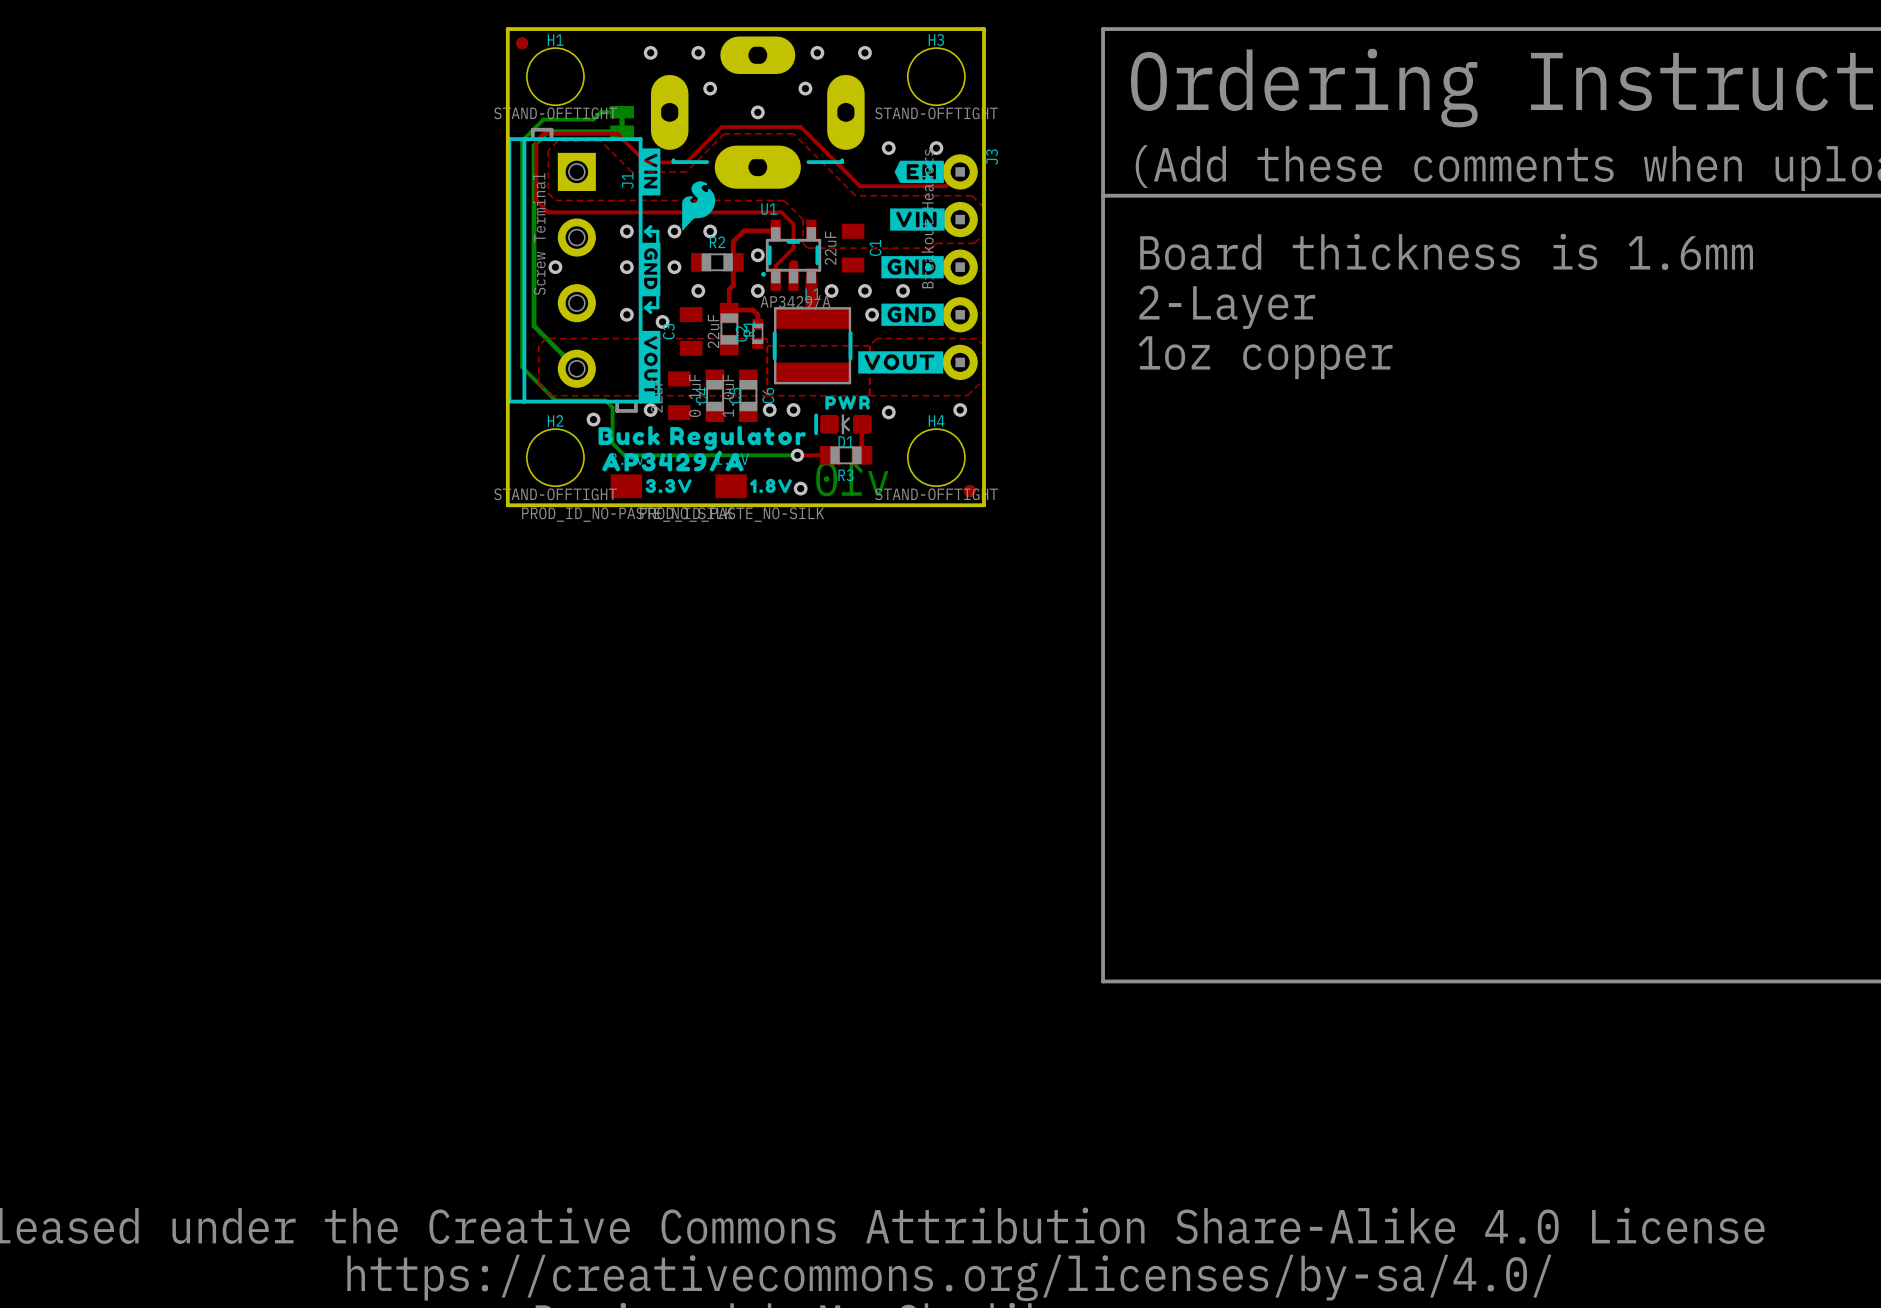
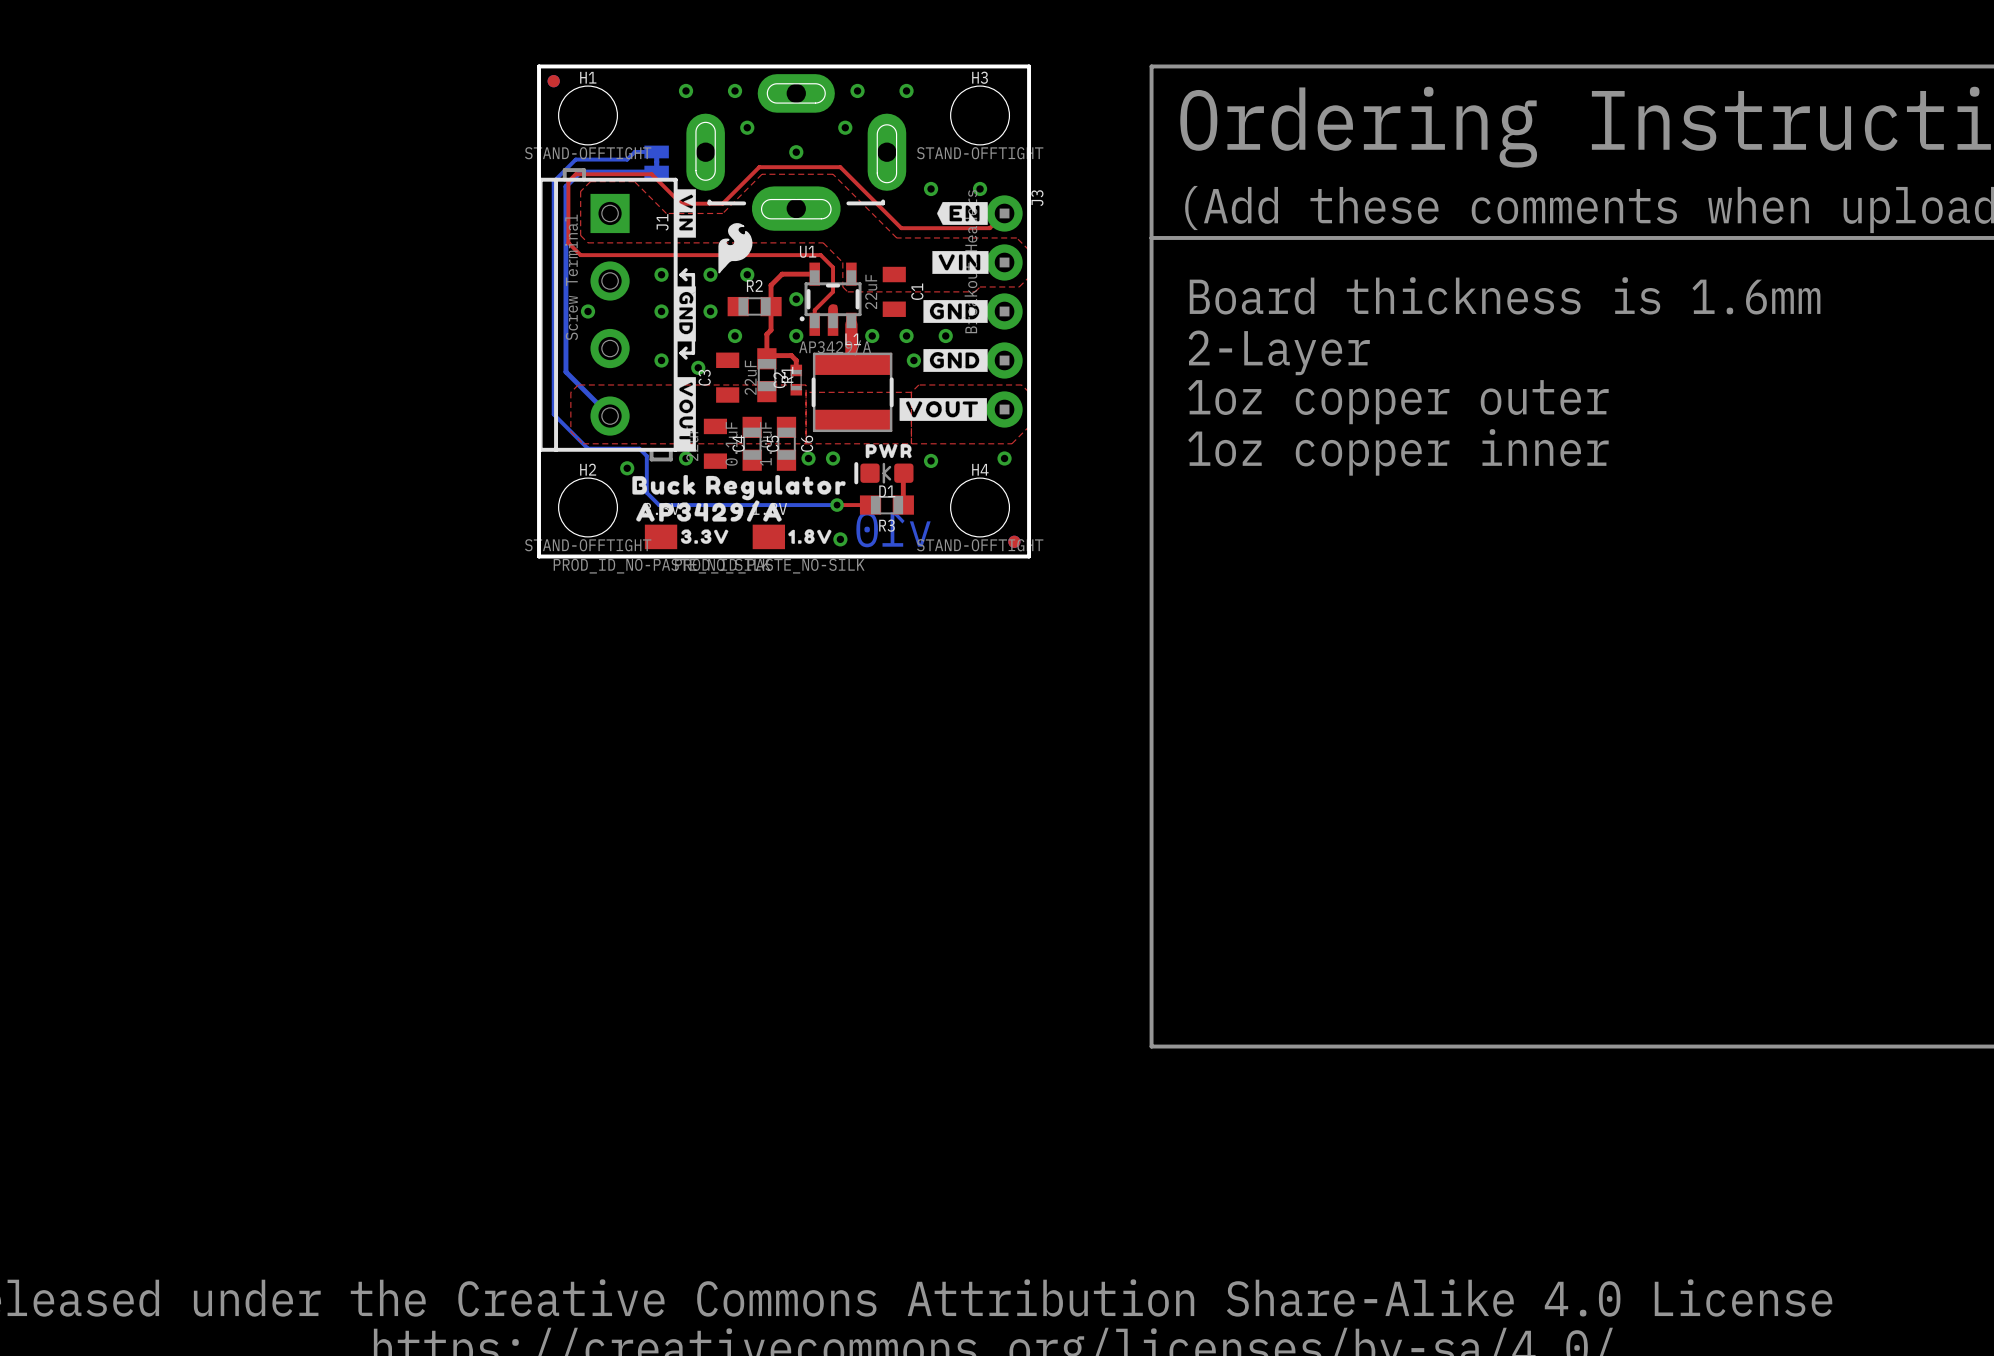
text: 1oz copper (1265, 357) -> 1oz copper outer (1398, 402)
text: none -> 1oz copper inner (1398, 452)

